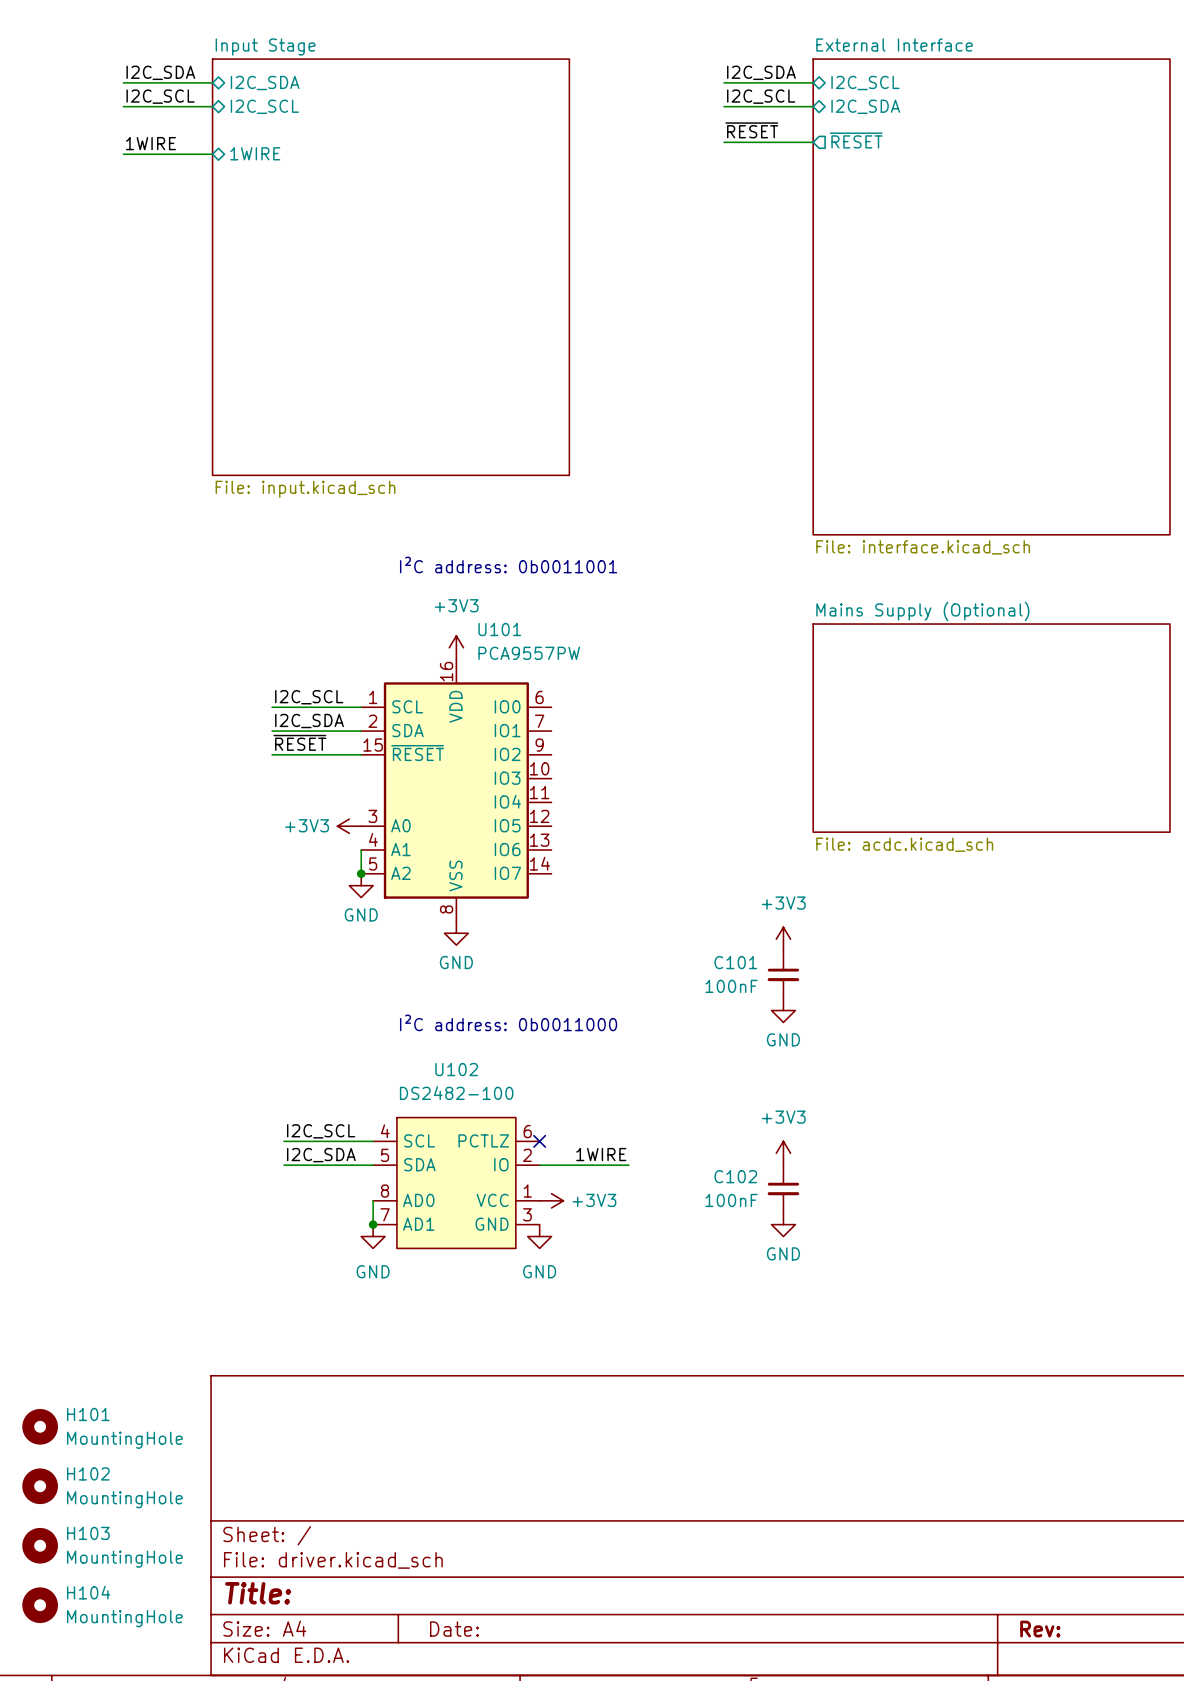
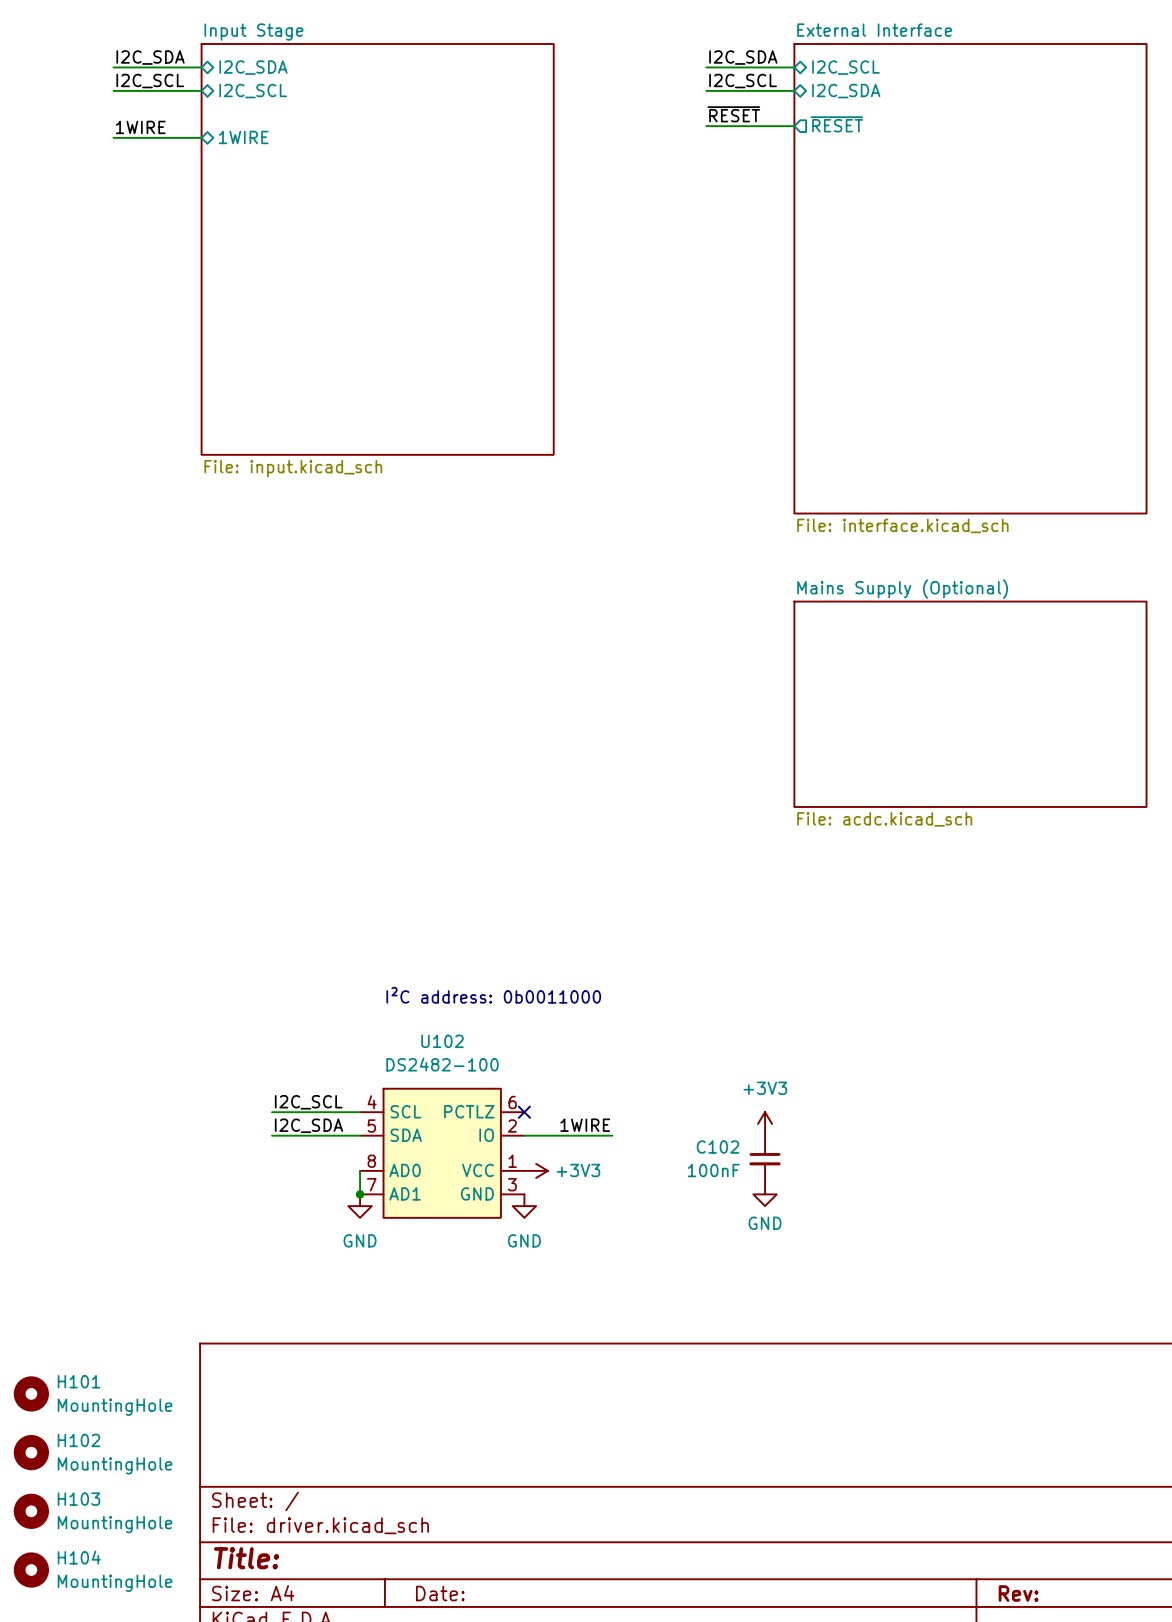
text: I²C address: 0b0011001 (508, 565) -> none
power symbol: +3V3 (456, 647) -> none
label: I2C_SCL (309, 697) -> none
wire: (272, 707) (361, 707) -> none
label: I2C_SDA (309, 721) -> none
wire: (272, 731) (361, 731) -> none
label: ~{RESET} (299, 742) -> none
wire: (272, 754) (361, 754) -> none
U101: PCA9557PW (456, 790) -> none
power symbol: +3V3 (349, 826) -> none
wire: (361, 849) (361, 873) -> none
junction: (361, 873) -> none
power symbol: GND (361, 885) -> none
power symbol: GND (456, 933) -> none
power symbol: +3V3 (783, 939) -> none
C101: 100nF (783, 974) -> none
power symbol: GND (783, 1010) -> none

